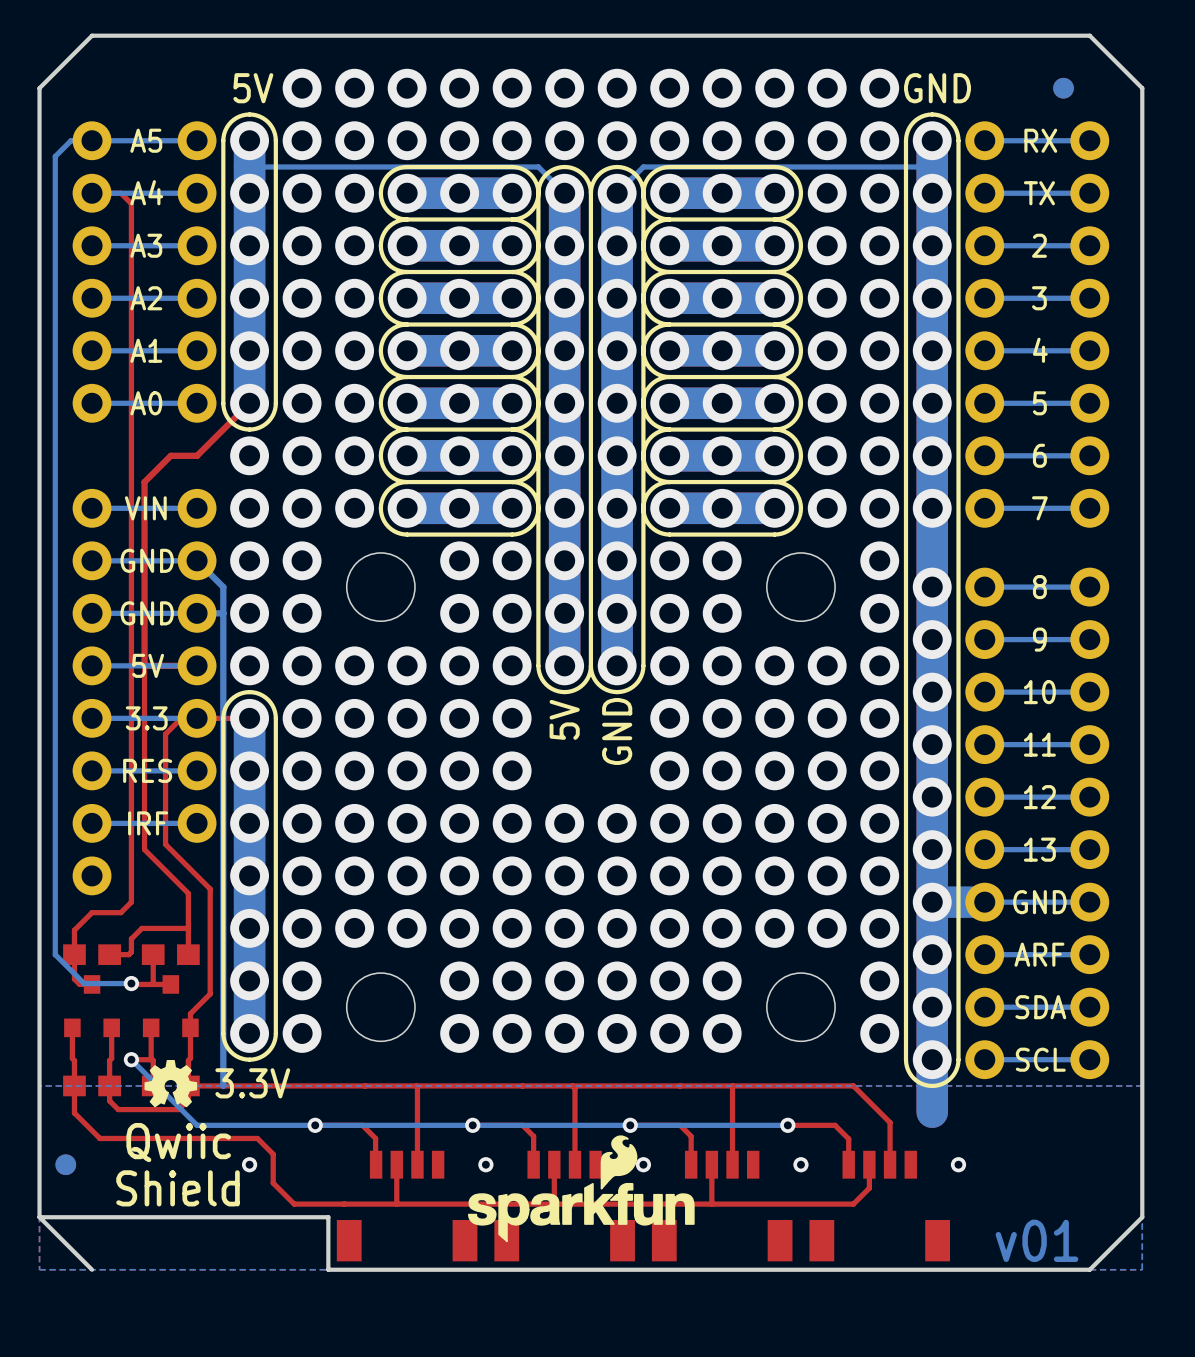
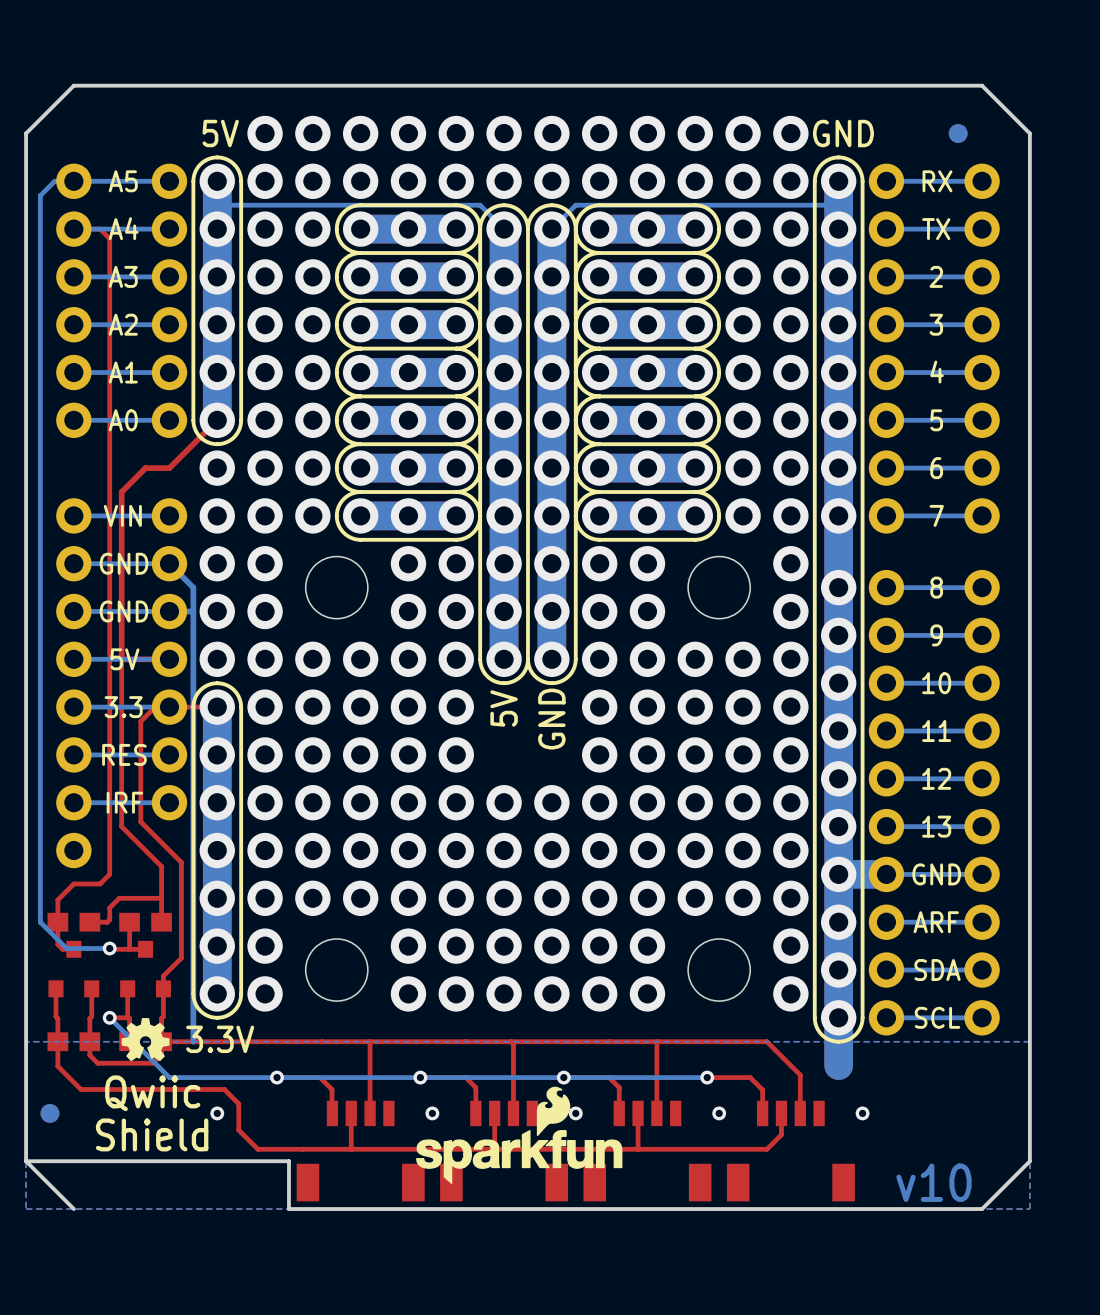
text: v01 (1036, 1240) -> v10 (934, 1182)

